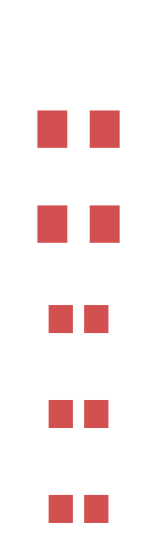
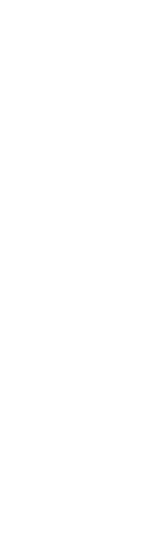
part: (78, 129) -> none
part: (78, 224) -> none
part: (78, 319) -> none
part: (78, 413) -> none
part: (78, 508) -> none

